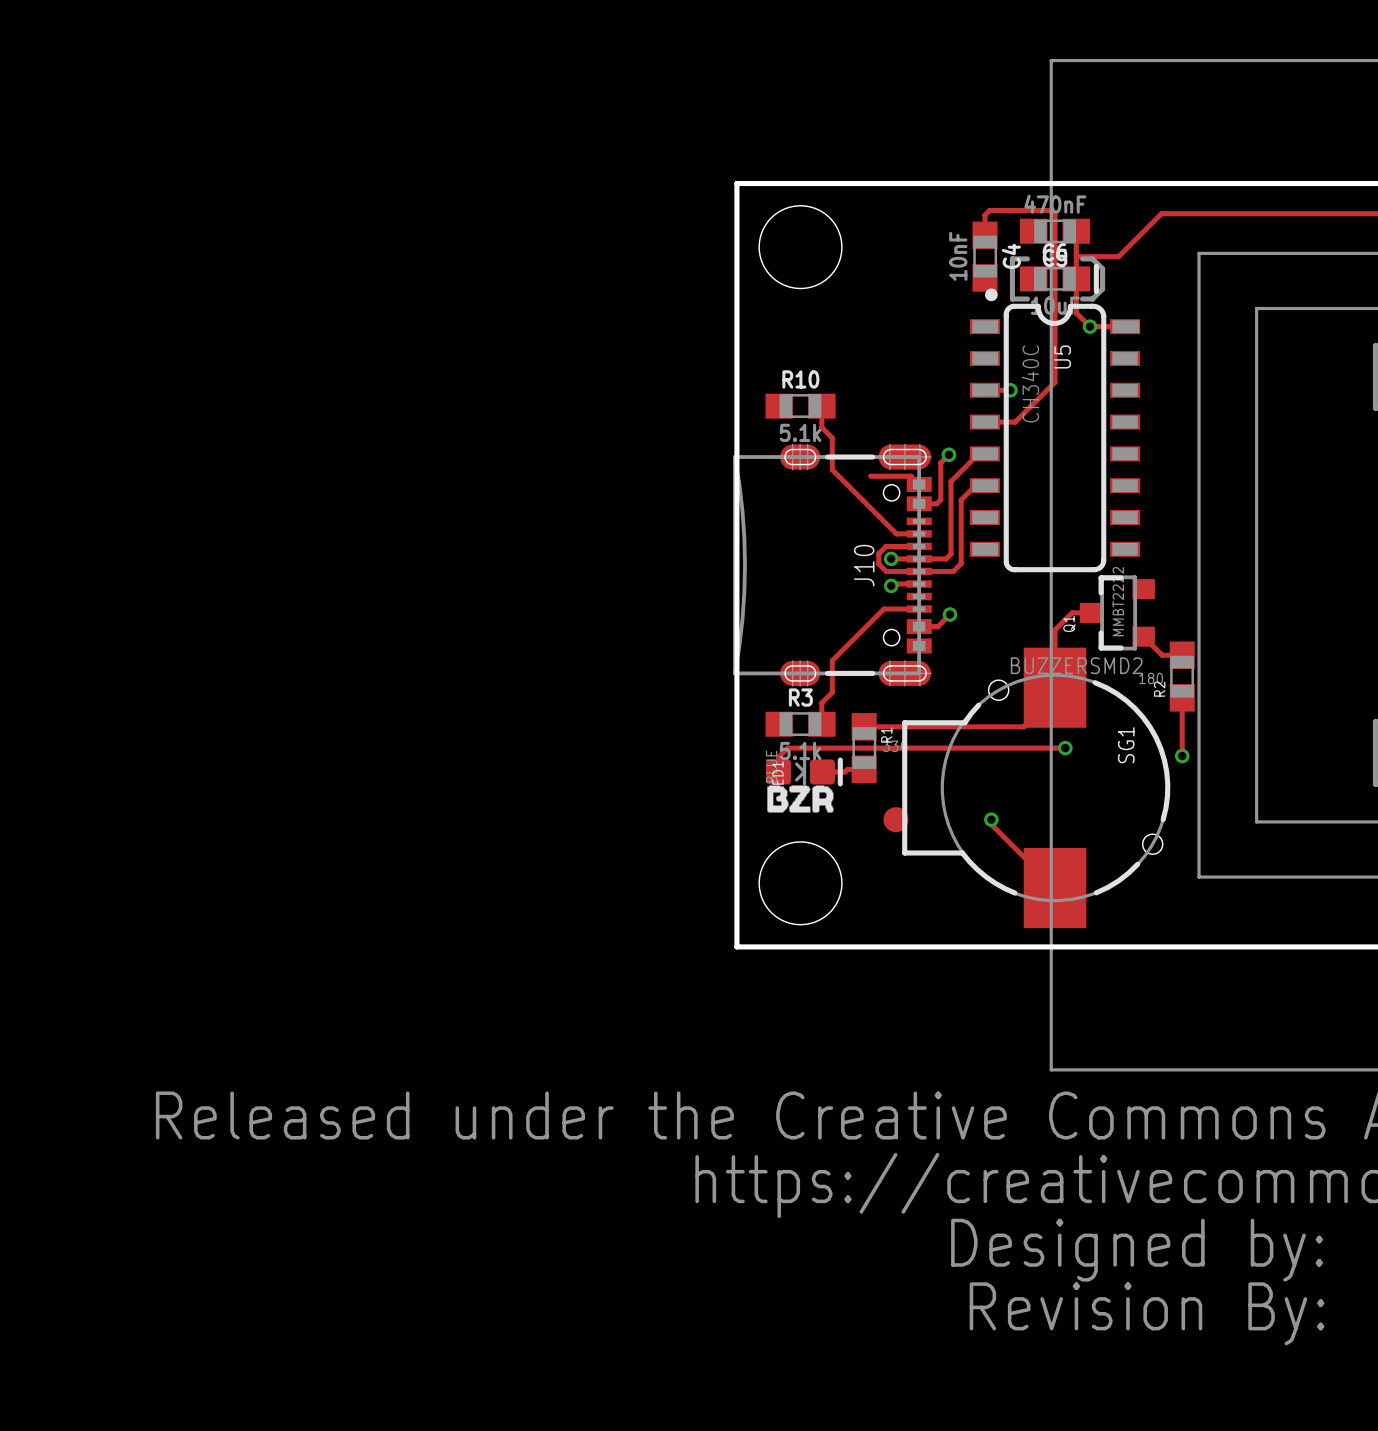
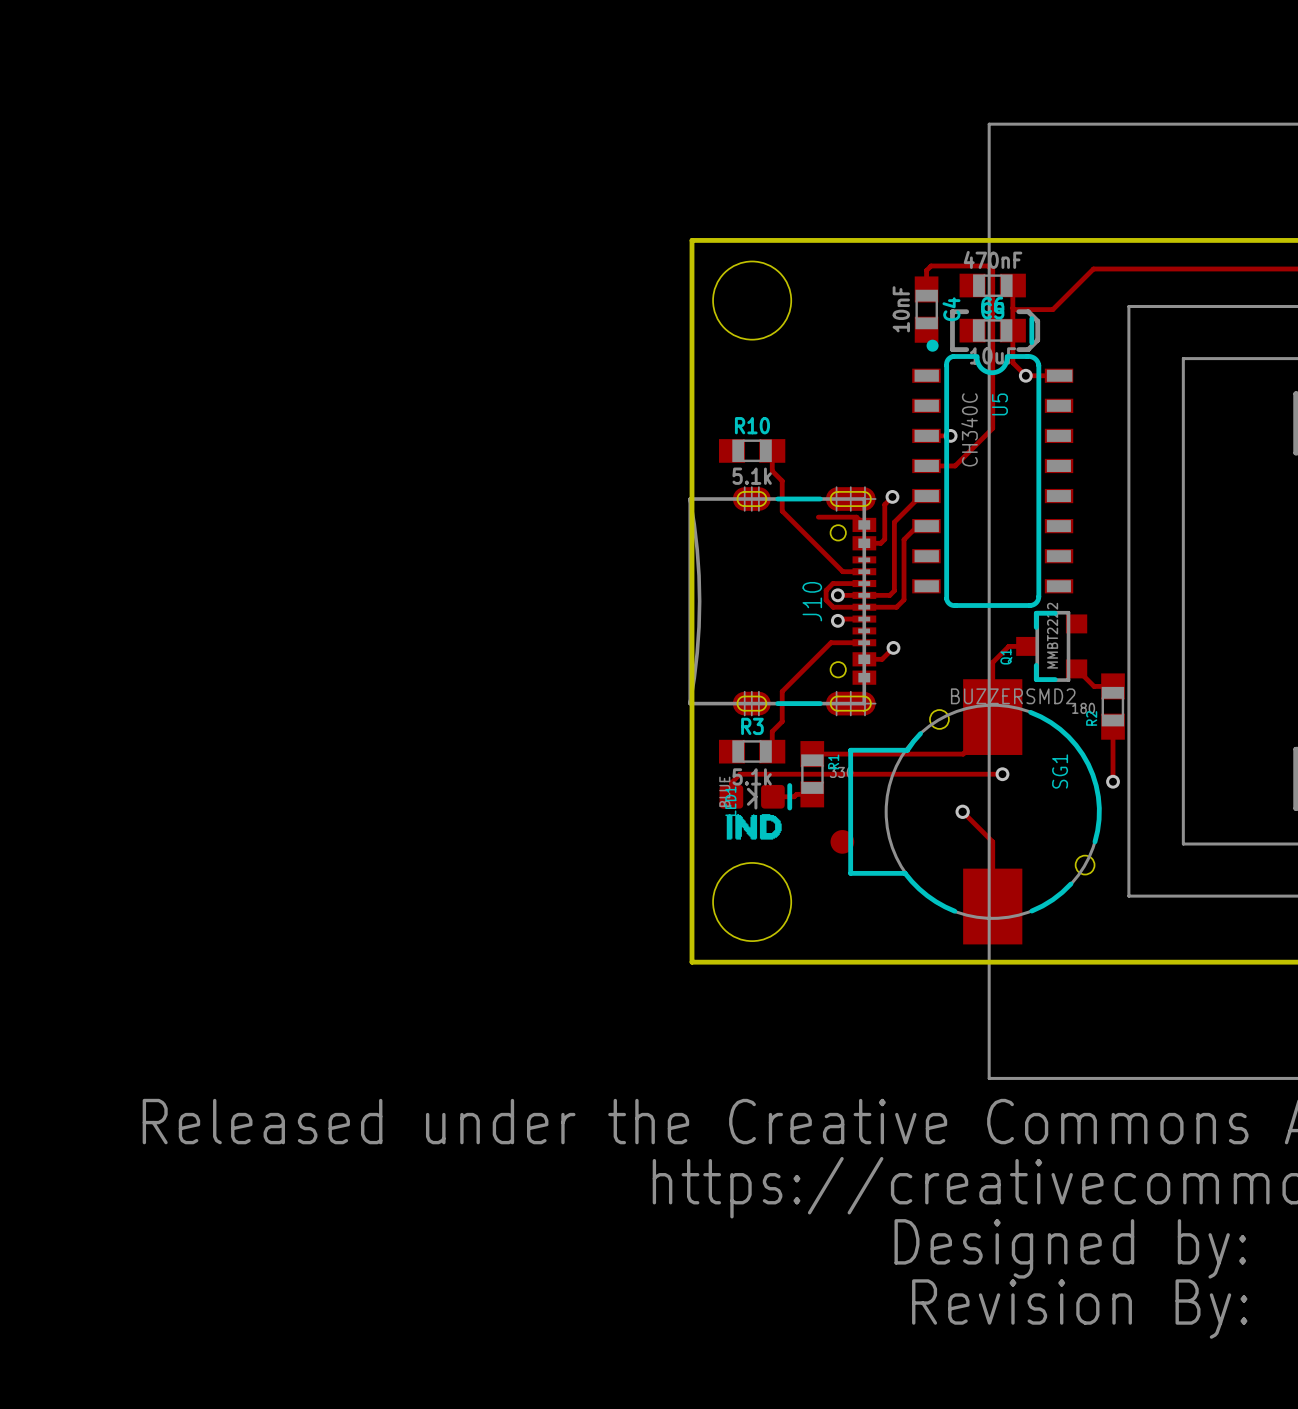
drawing shape: [767, 785, 834, 813] -> [726, 814, 782, 840]
via: none -> (962, 811)
track: (991, 819) (991, 824) (1055, 888) -> (962, 811) (992, 841) (992, 906)
via: (991, 819) -> none

